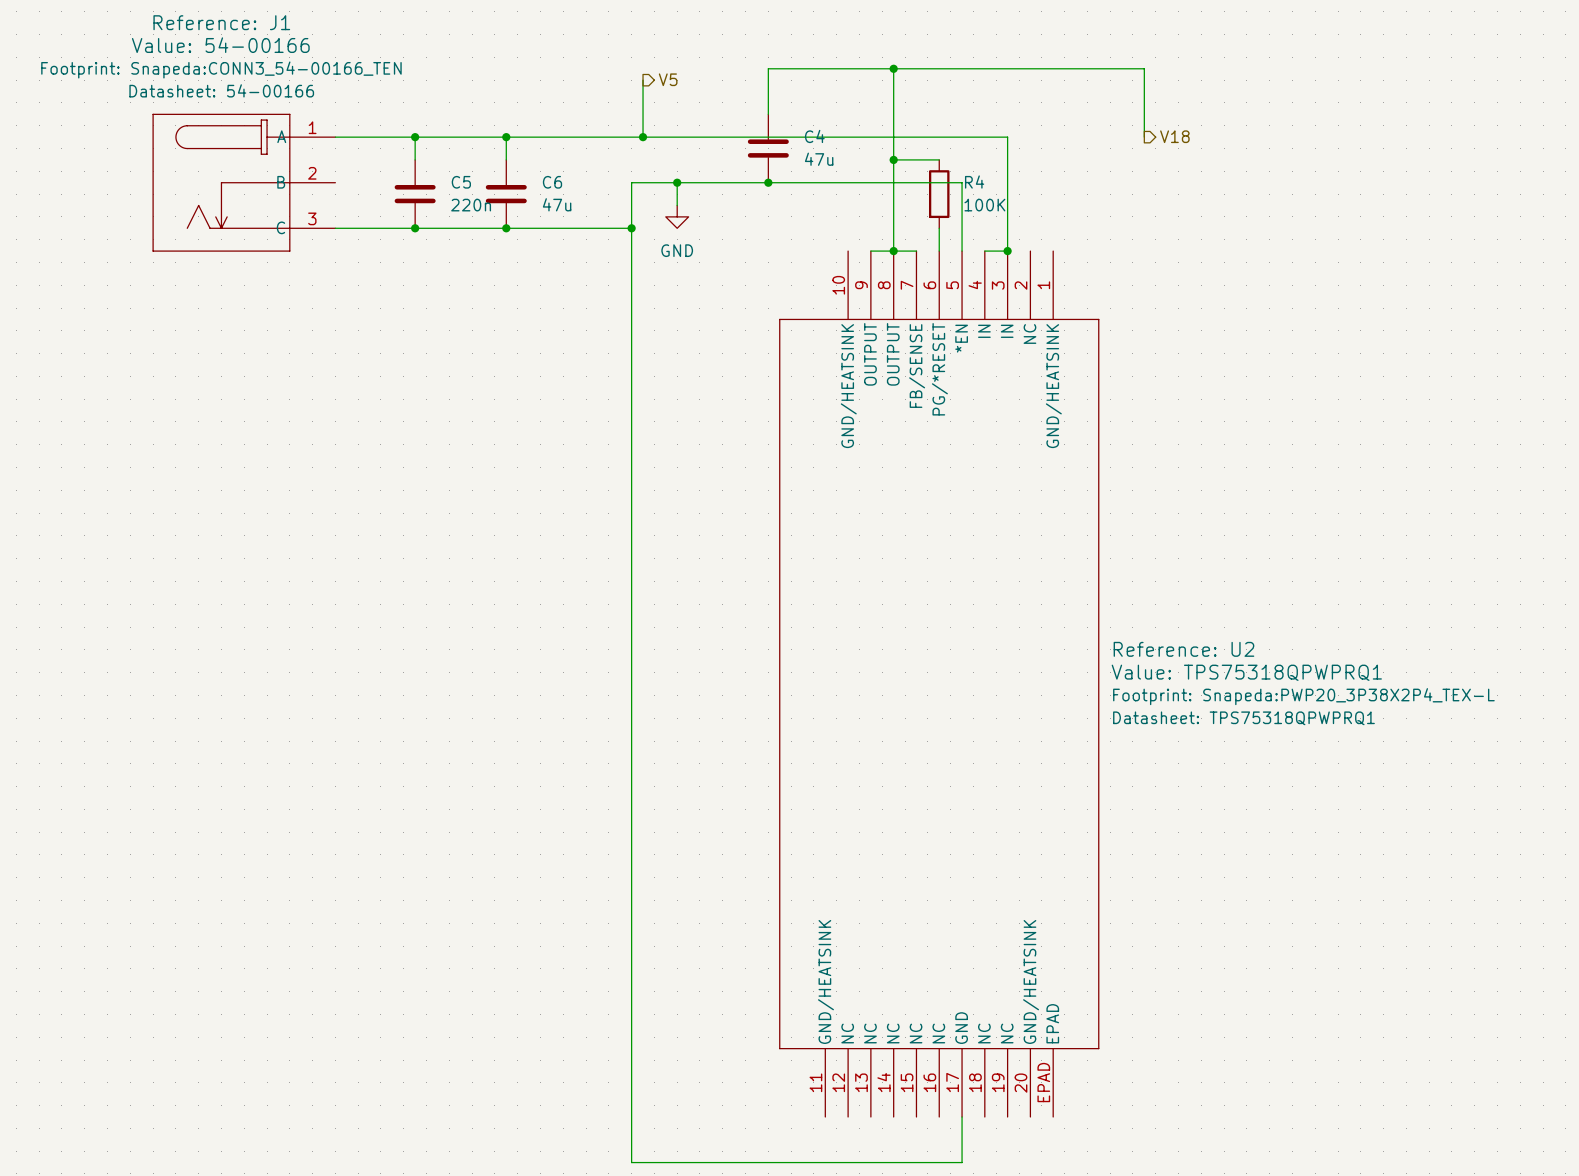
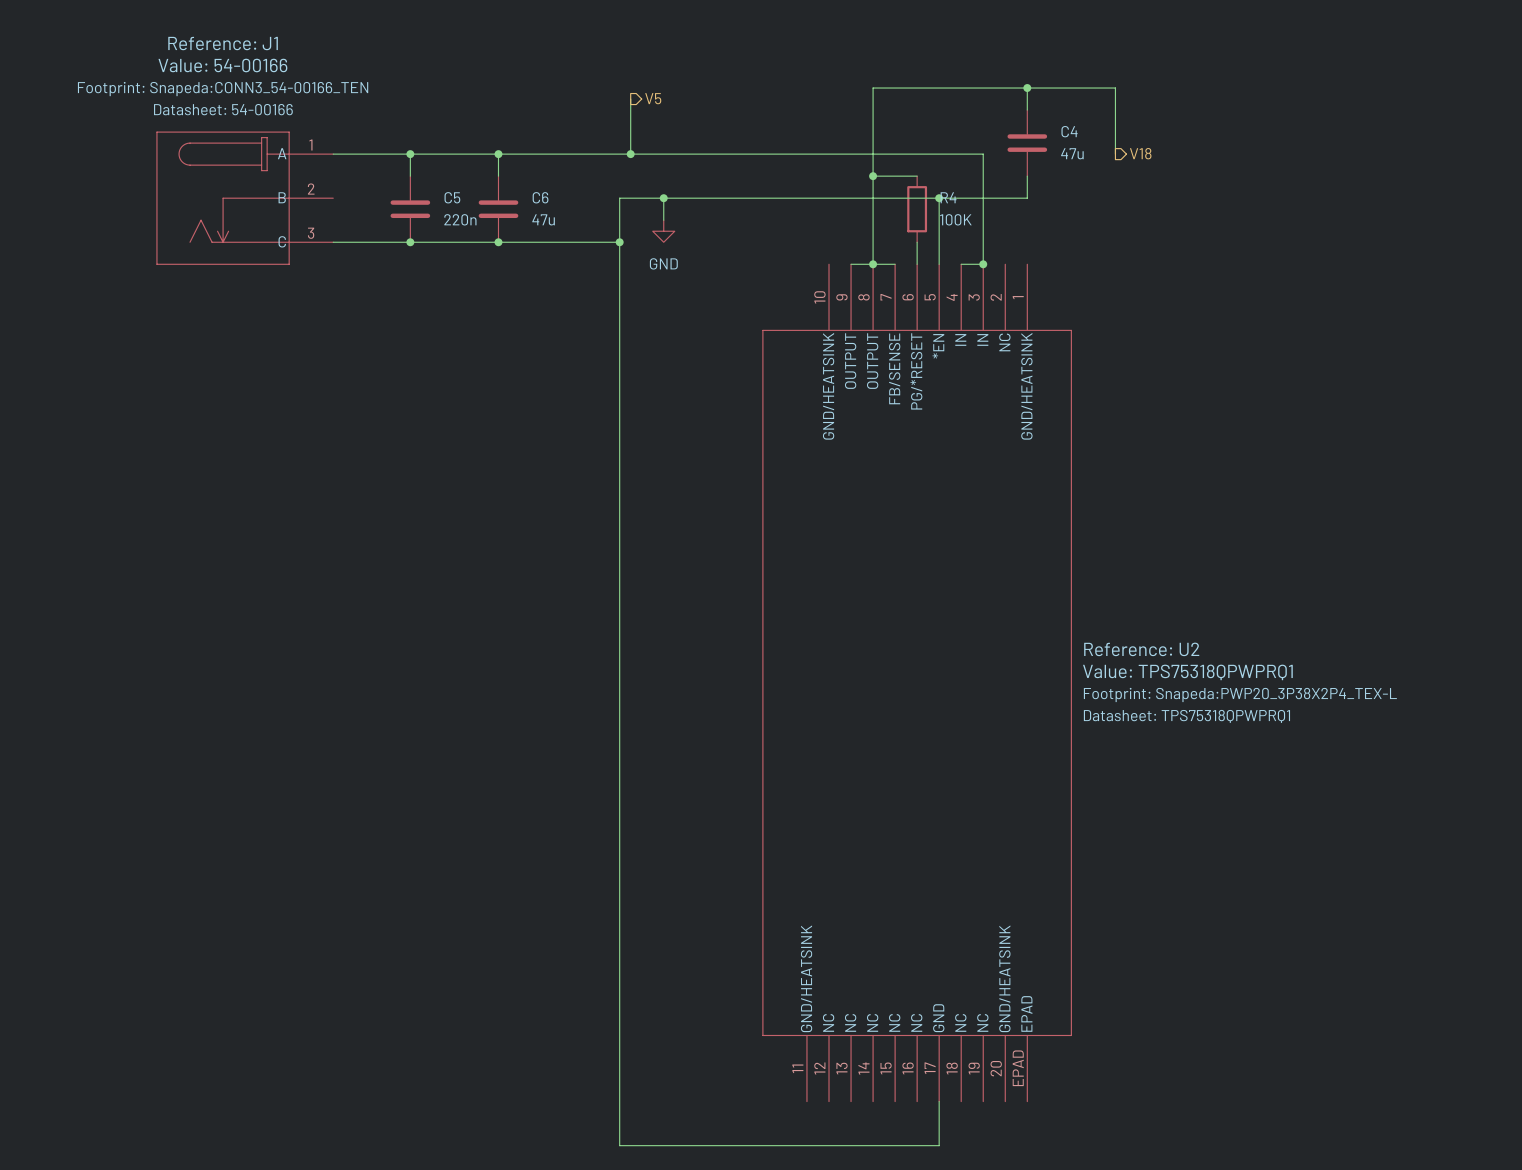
wire: (893, 68) (768, 68) (768, 114) -> none
junction: (893, 68) -> none
wire: none -> (1027, 88) (1027, 110)
junction: none -> (1027, 88)
C4 position: (768, 148) -> (1027, 143)
wire: none -> (1027, 176) (1027, 198) (939, 198)
junction: (768, 182) -> none
junction: none -> (939, 198)

